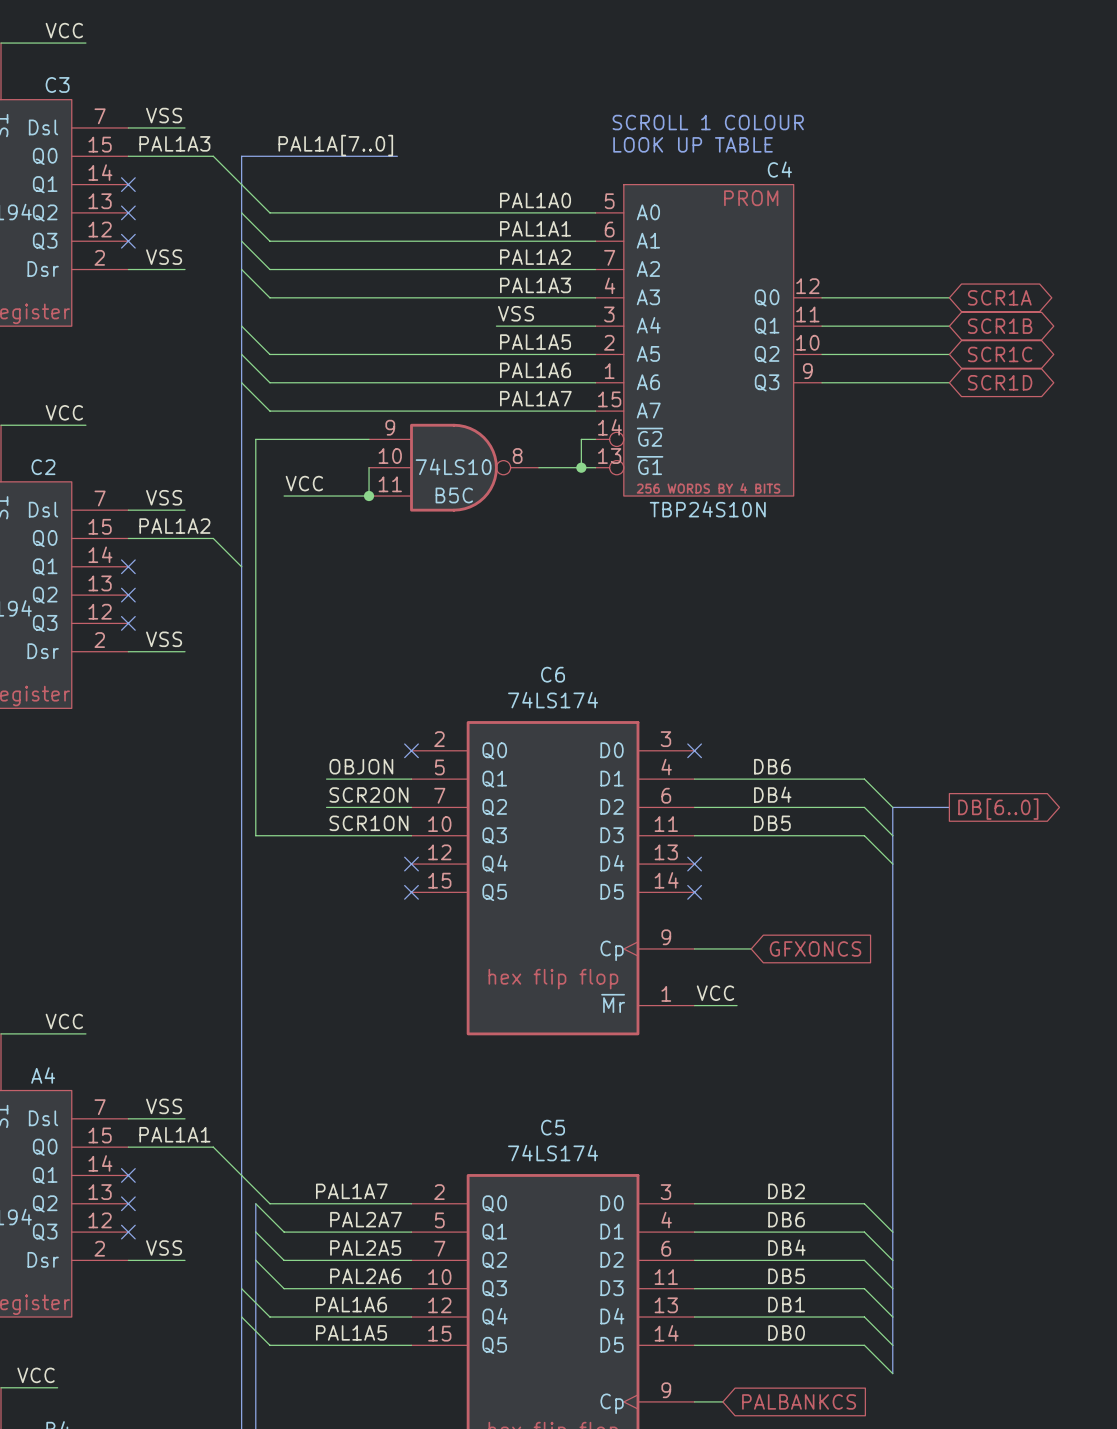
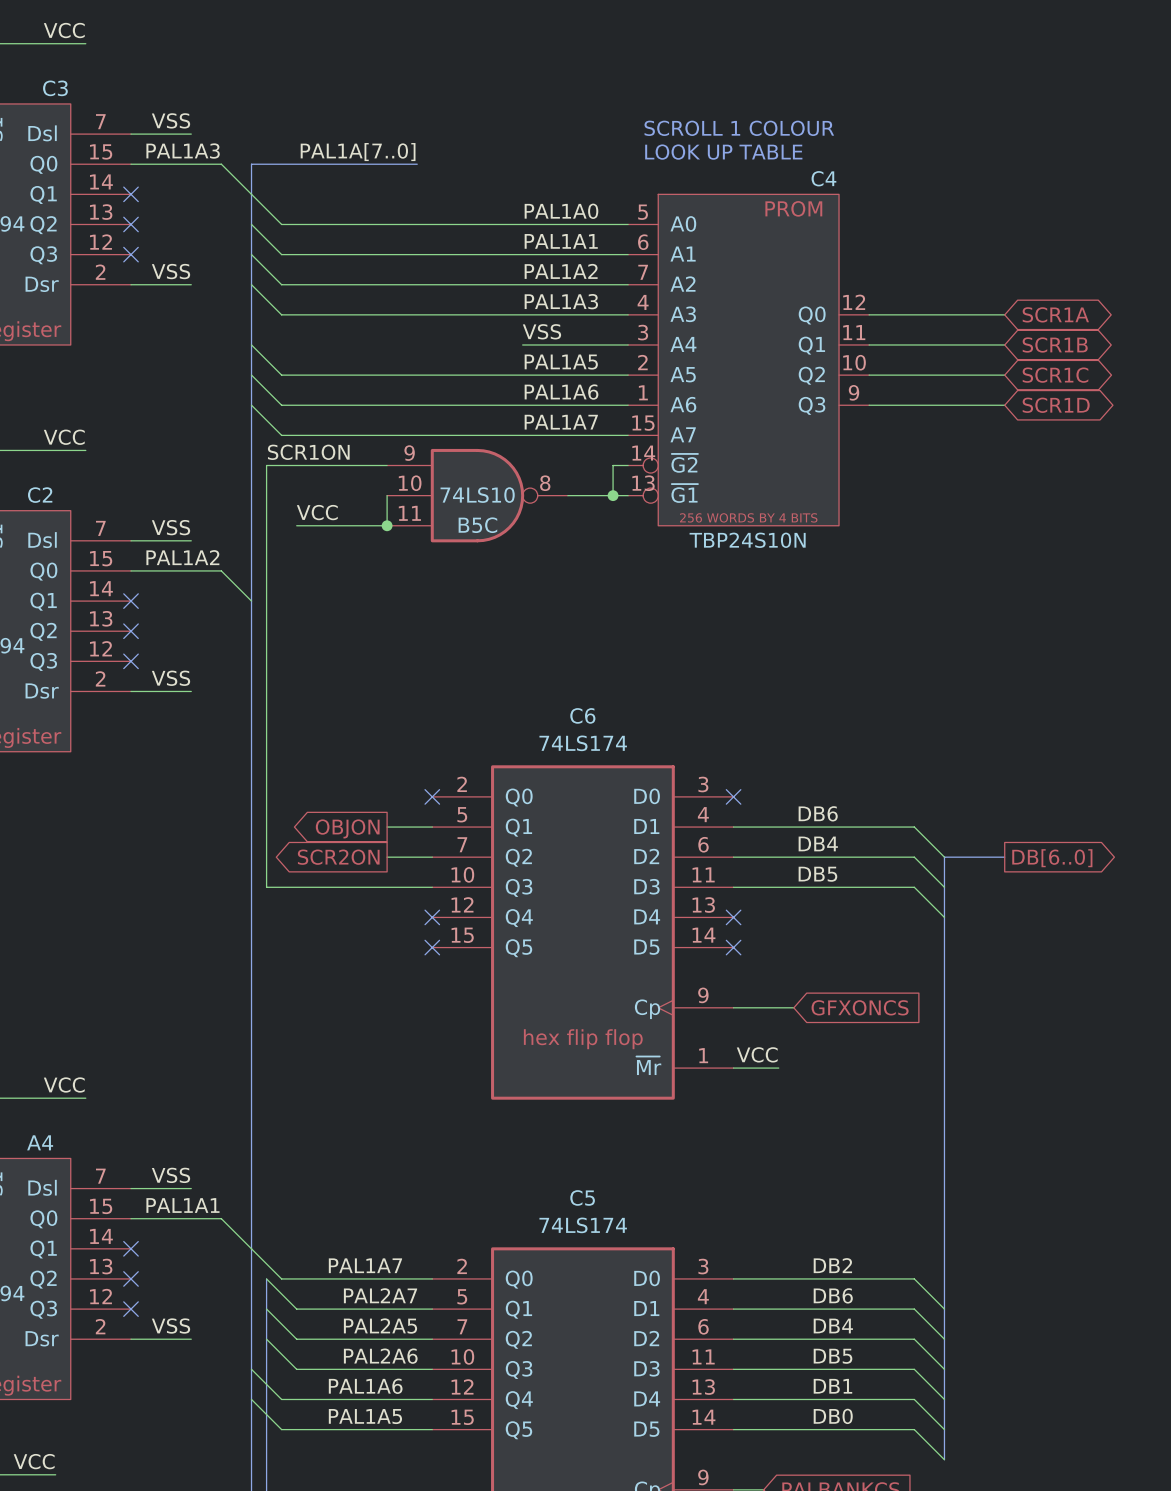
label: none -> SCR1ON (308, 452)
label: OBJON (361, 766) -> none
wire: (326, 779) (369, 779) -> none
global label: none -> OBJON (347, 828)
label: SCR2ON (368, 795) -> none
global label: none -> SCR2ON (338, 857)
wire: (326, 807) (369, 807) -> none
label: SCR1ON (368, 823) -> none

